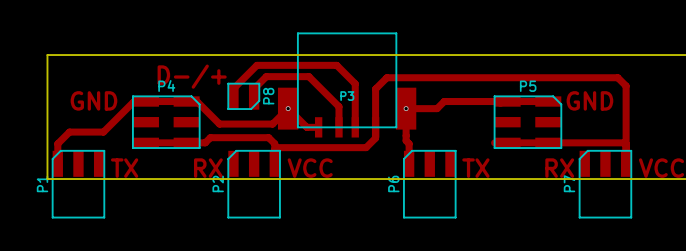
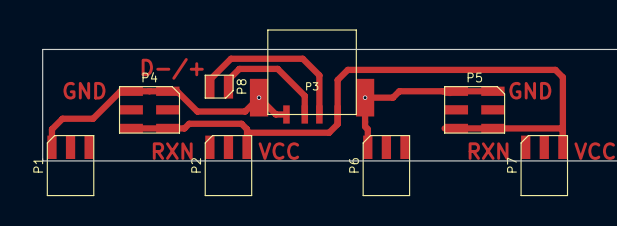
text: TX (124, 168) -> none
text: RX (208, 168) -> RXN (172, 151)
text: TX (475, 168) -> none
text: RX (559, 168) -> RXN (488, 151)

